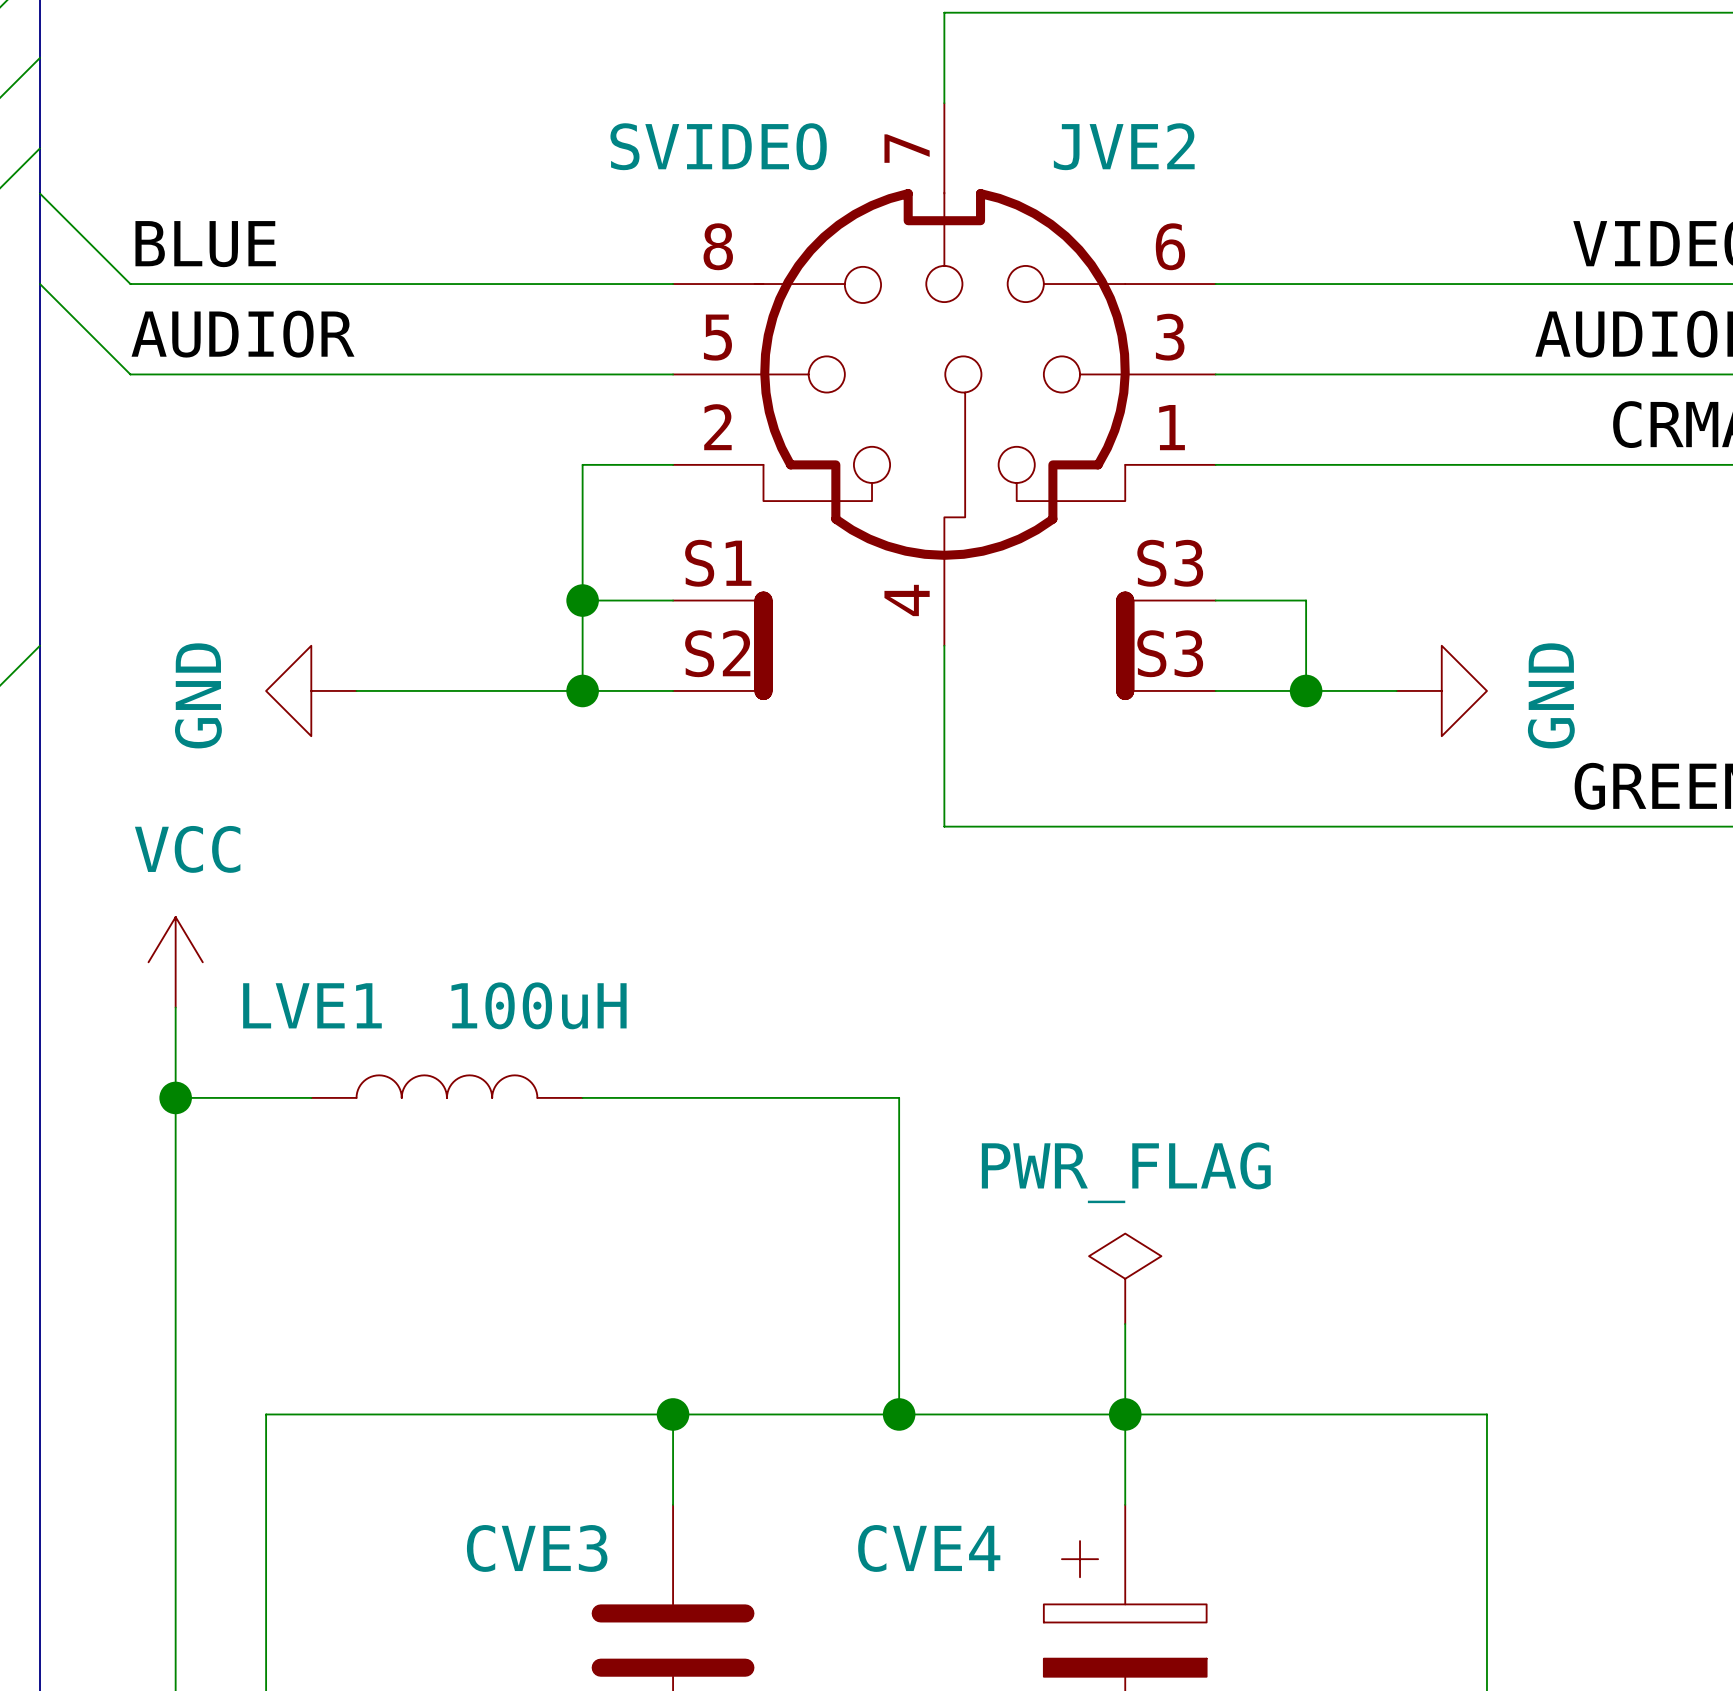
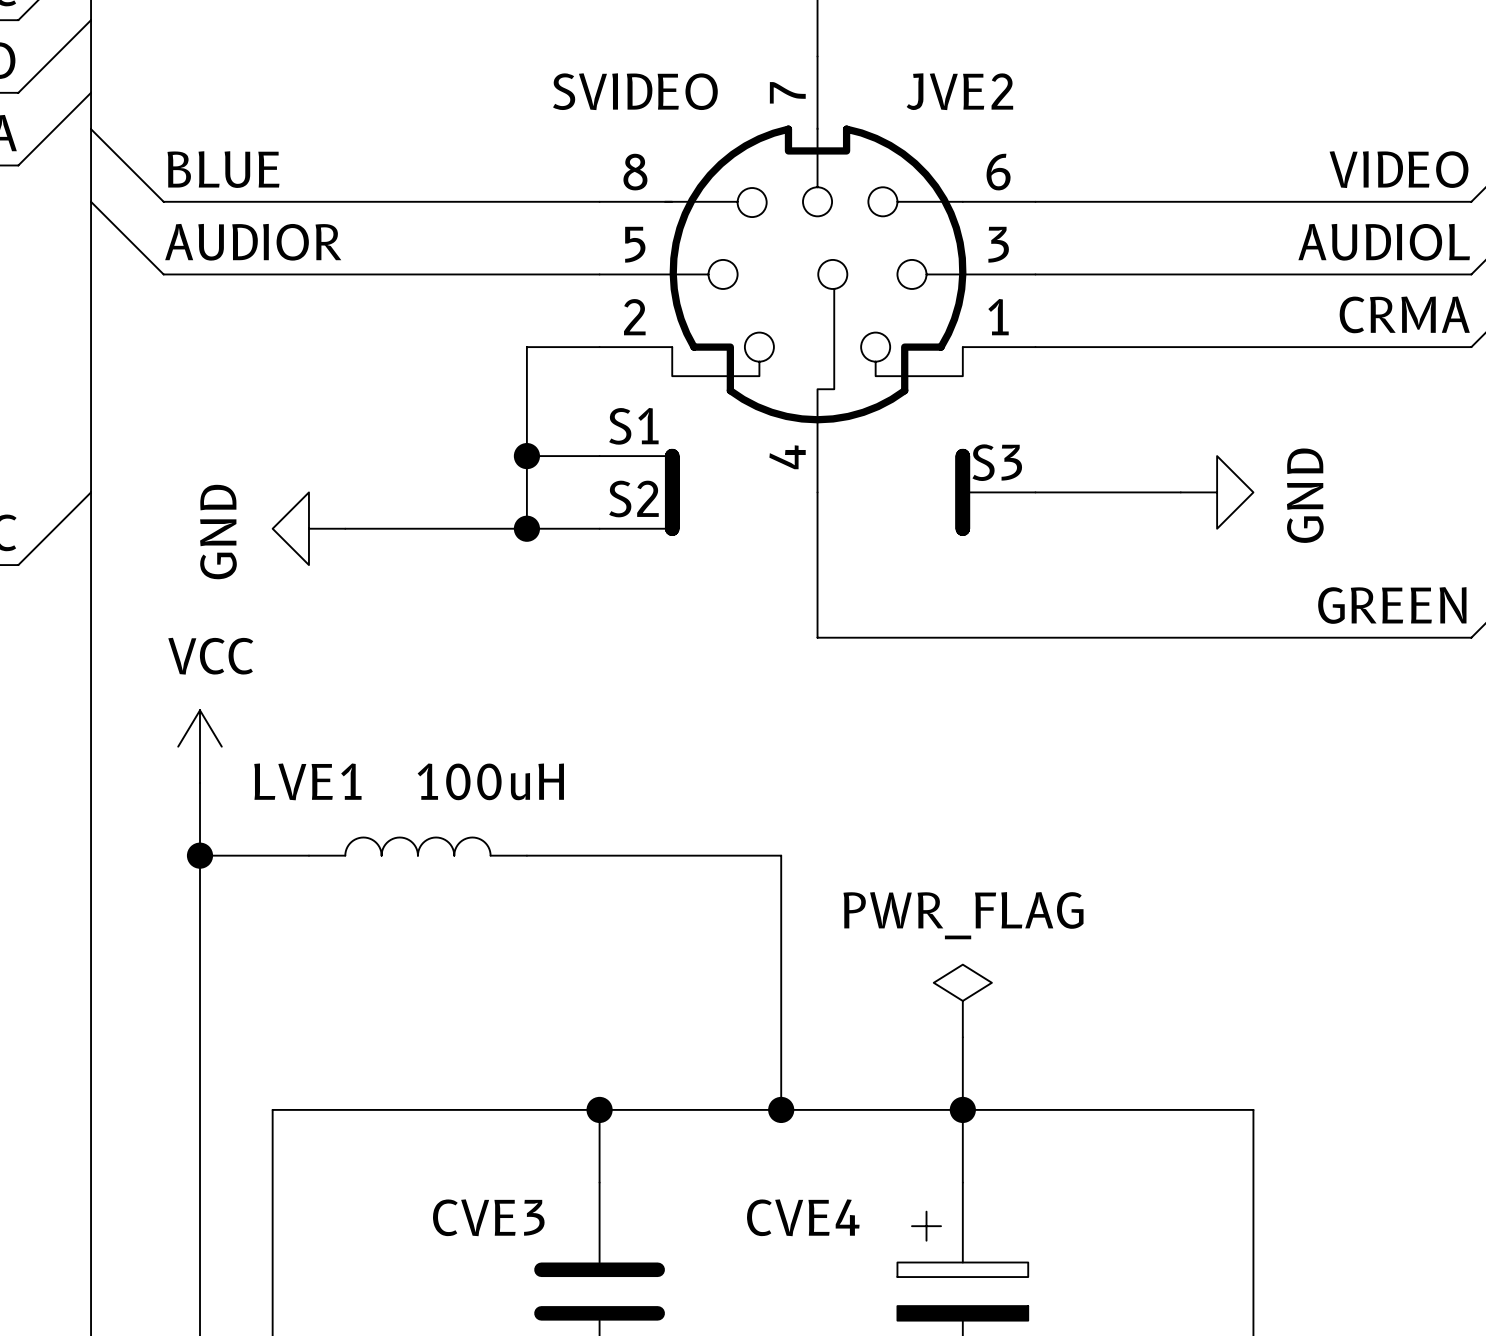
JVE2 symbol: [673, 103, 1216, 701] -> [599, 56, 1036, 537]
wire: (1215, 600) (1306, 600) (1306, 690) -> none
wire: (1215, 690) (1396, 690) -> (1035, 492) (1180, 492)
junction: (1306, 690) -> none
power symbol position: GND (1441, 690) -> GND (1217, 492)

